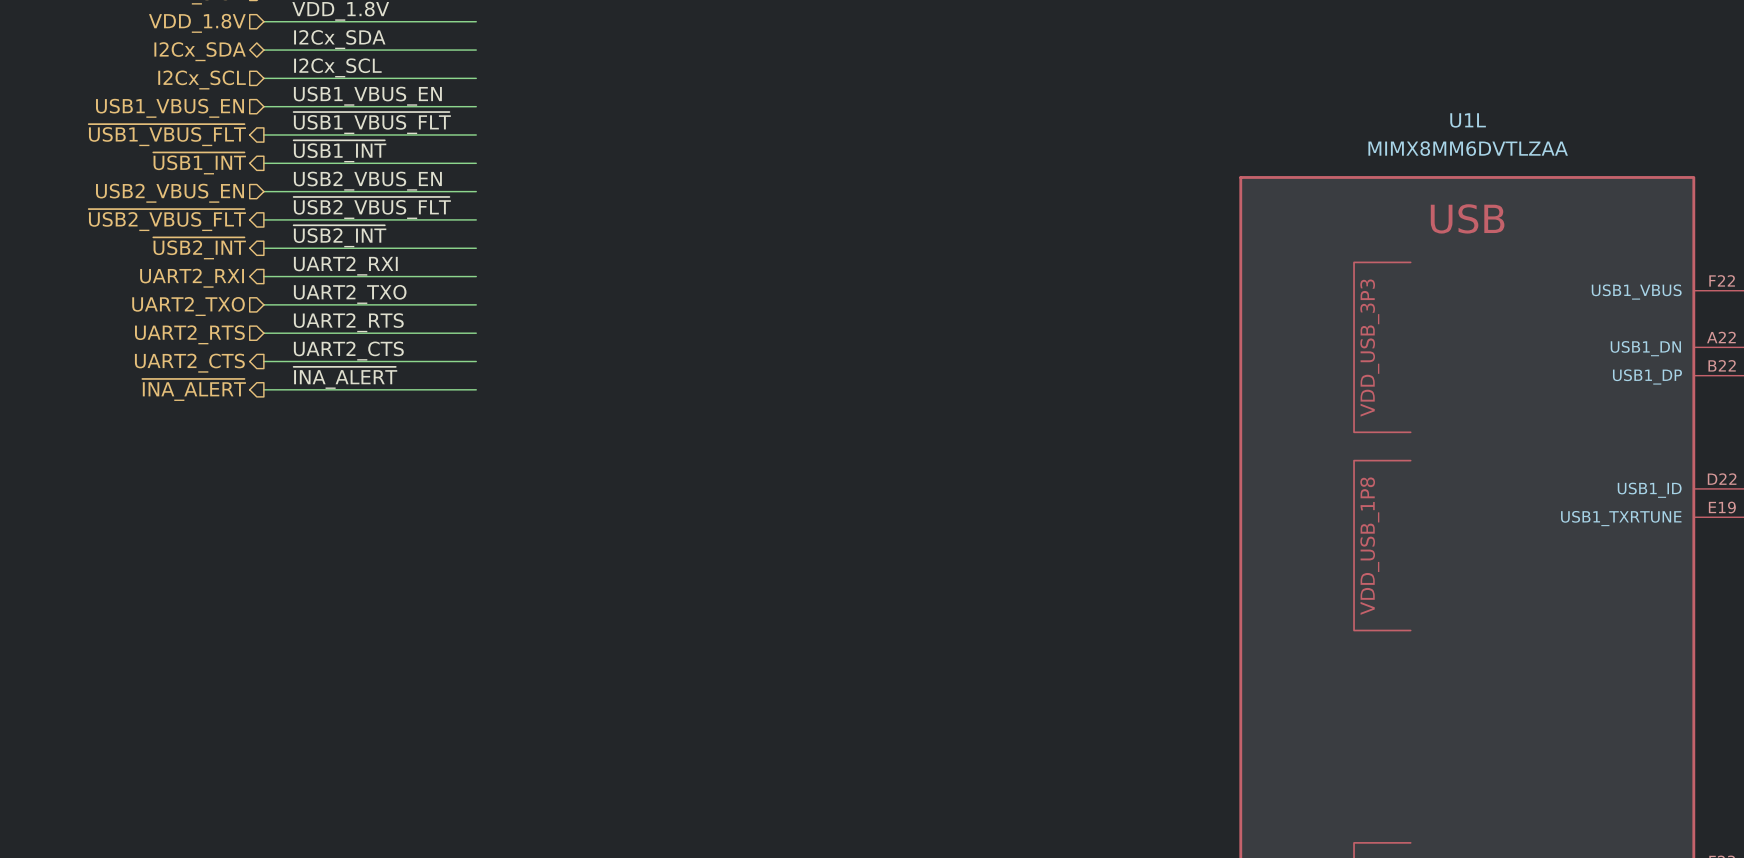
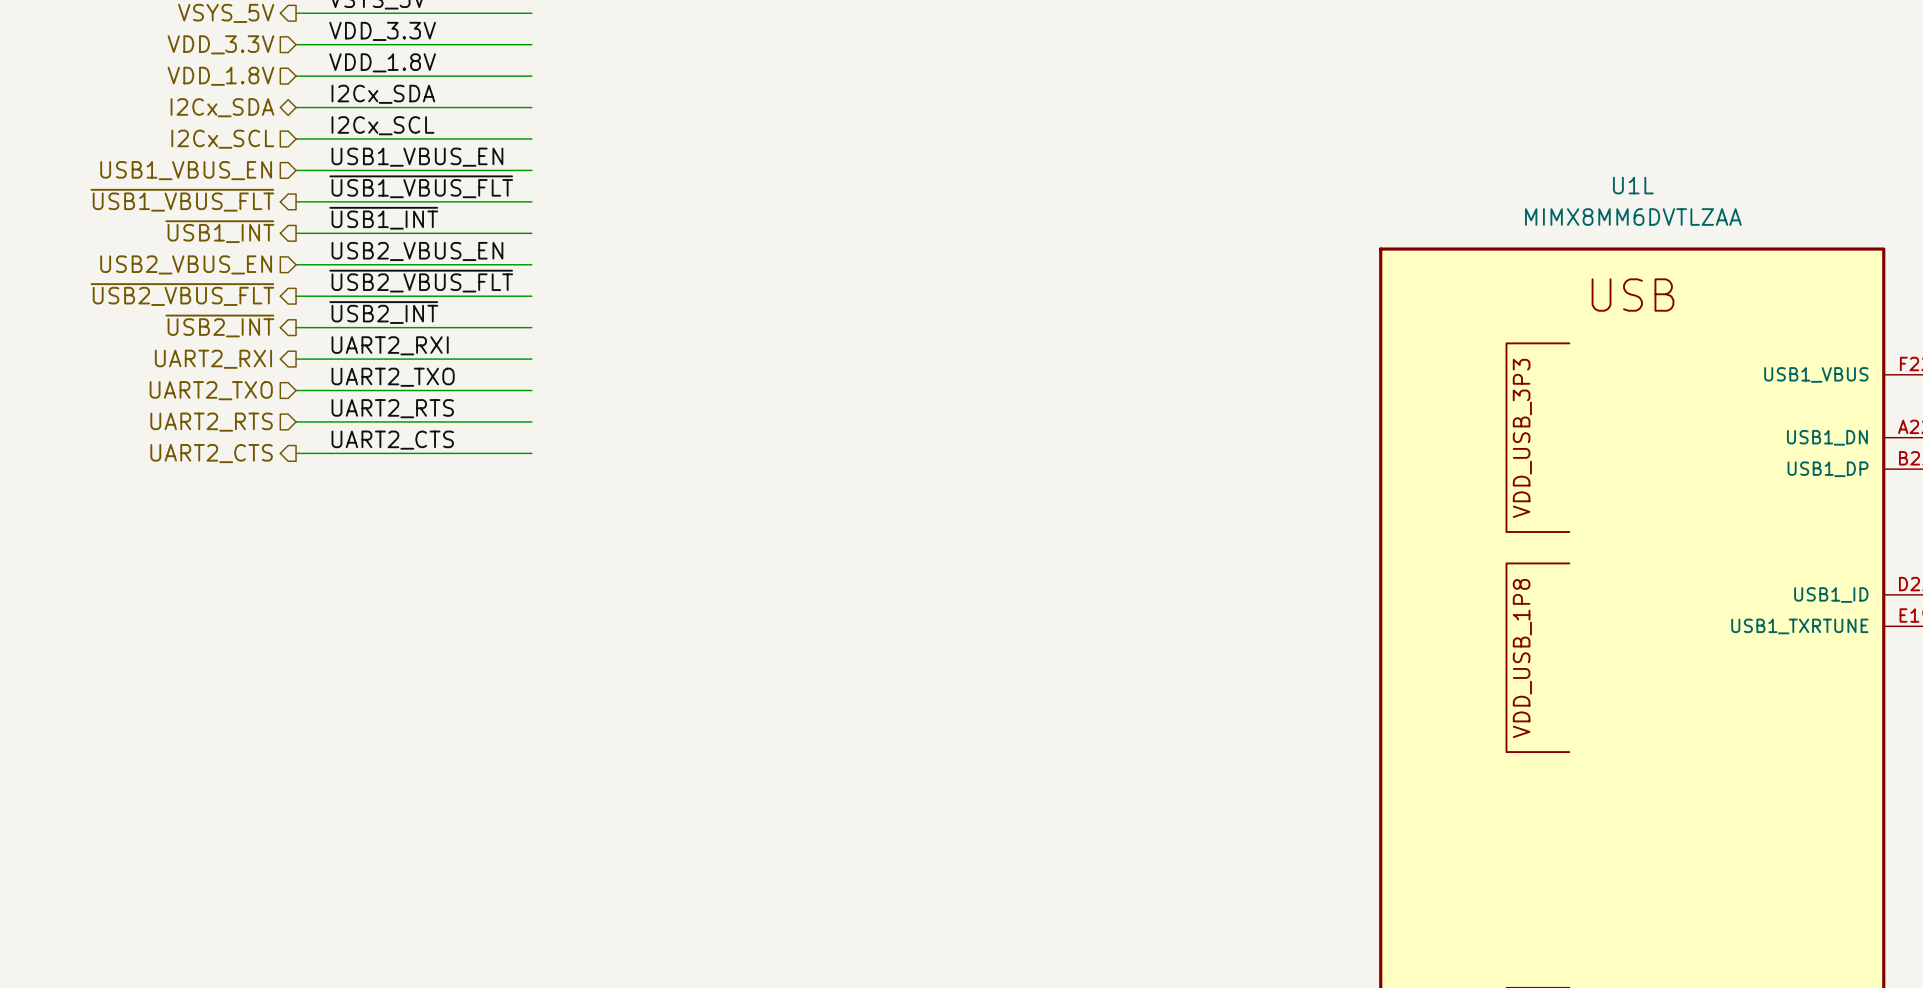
label: ~{INA_ALERT} (345, 377) -> none
hierarchical label: ~{INA_ALERT} (194, 389) -> none
wire: (263, 389) (476, 389) -> none

